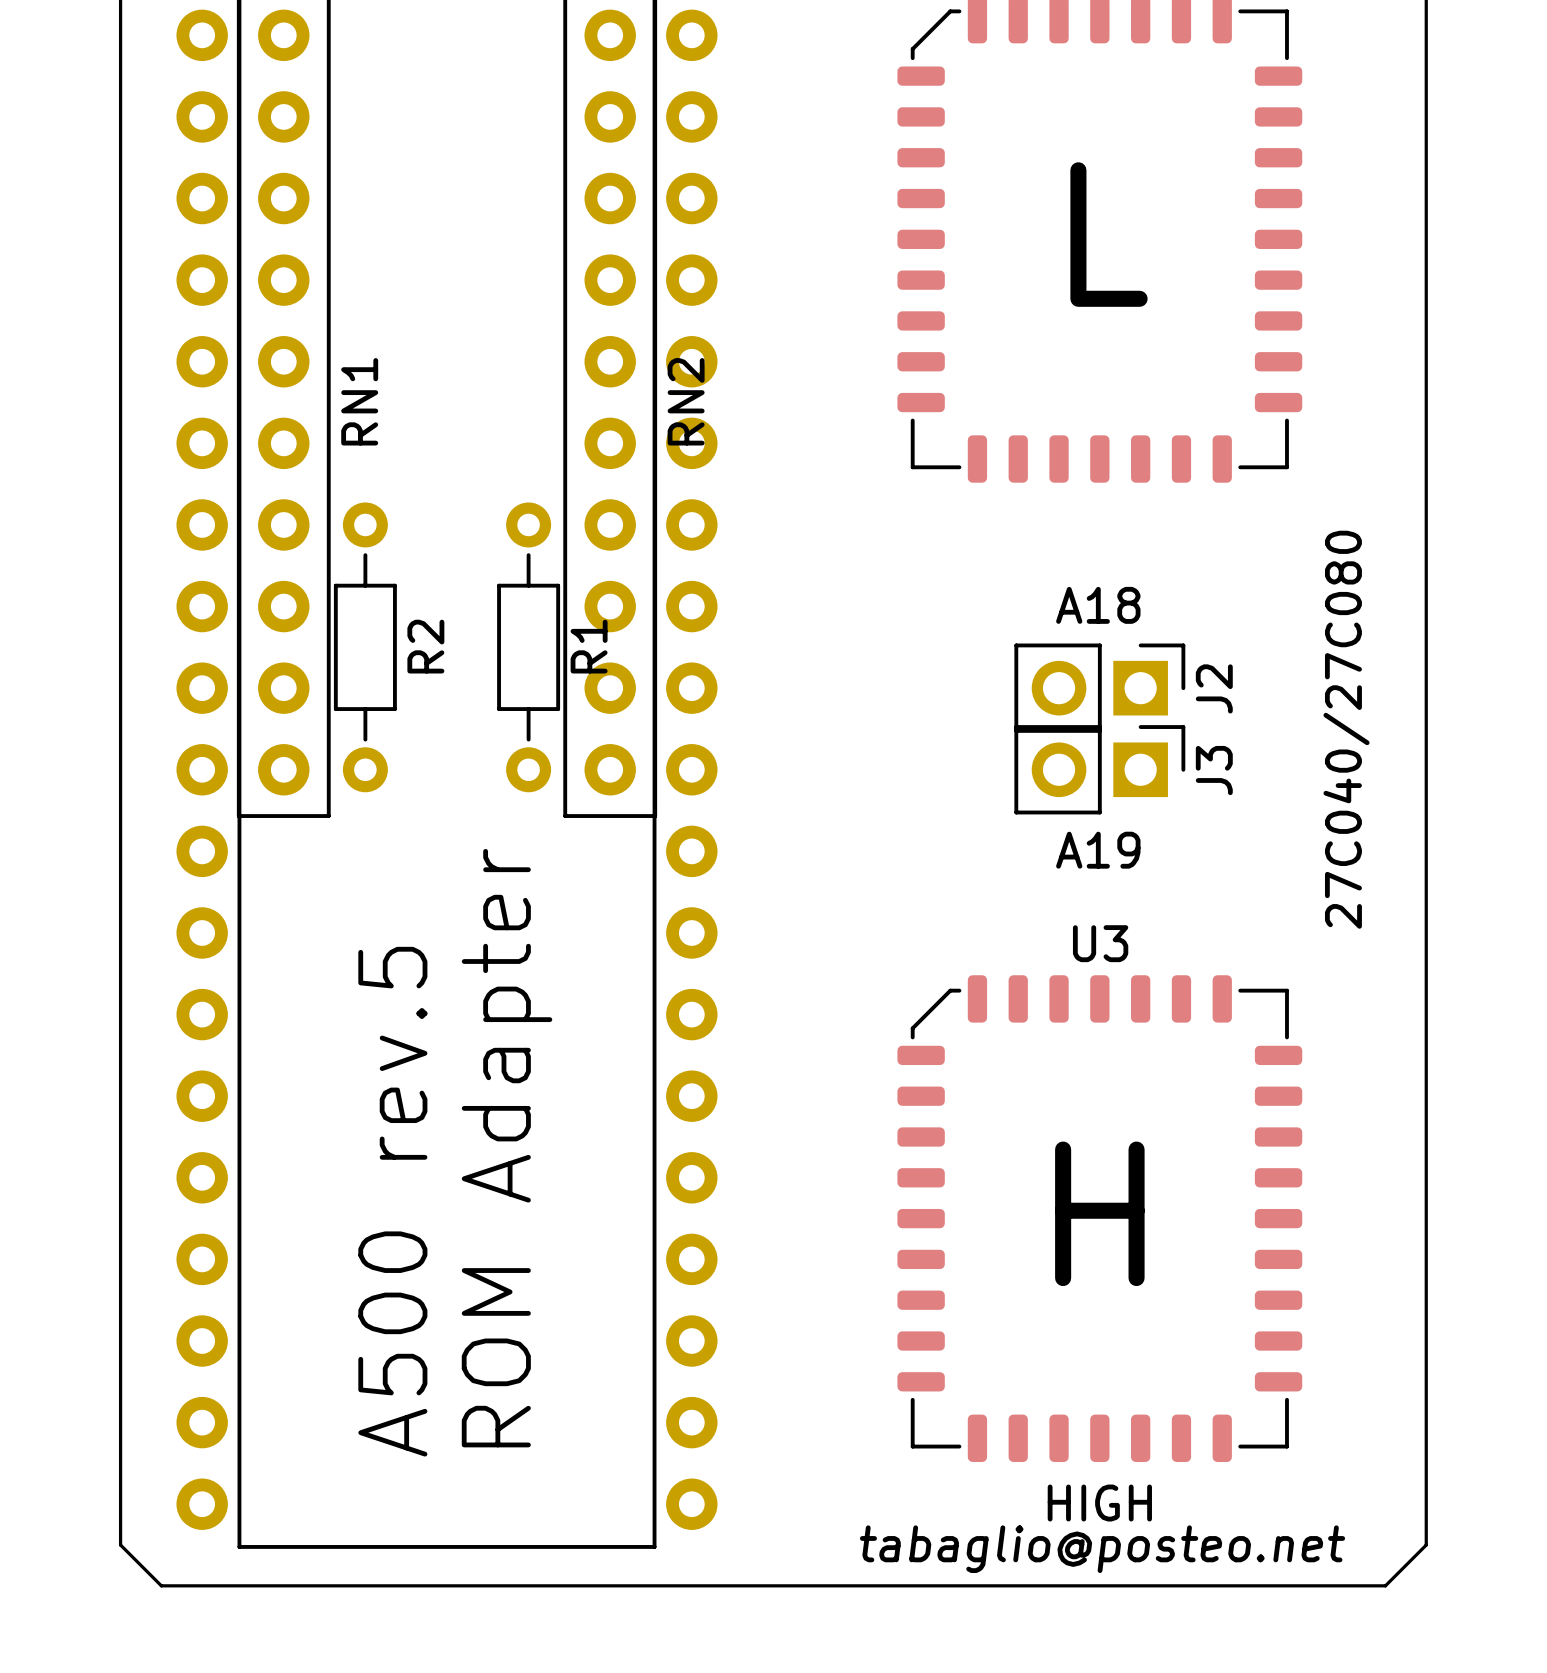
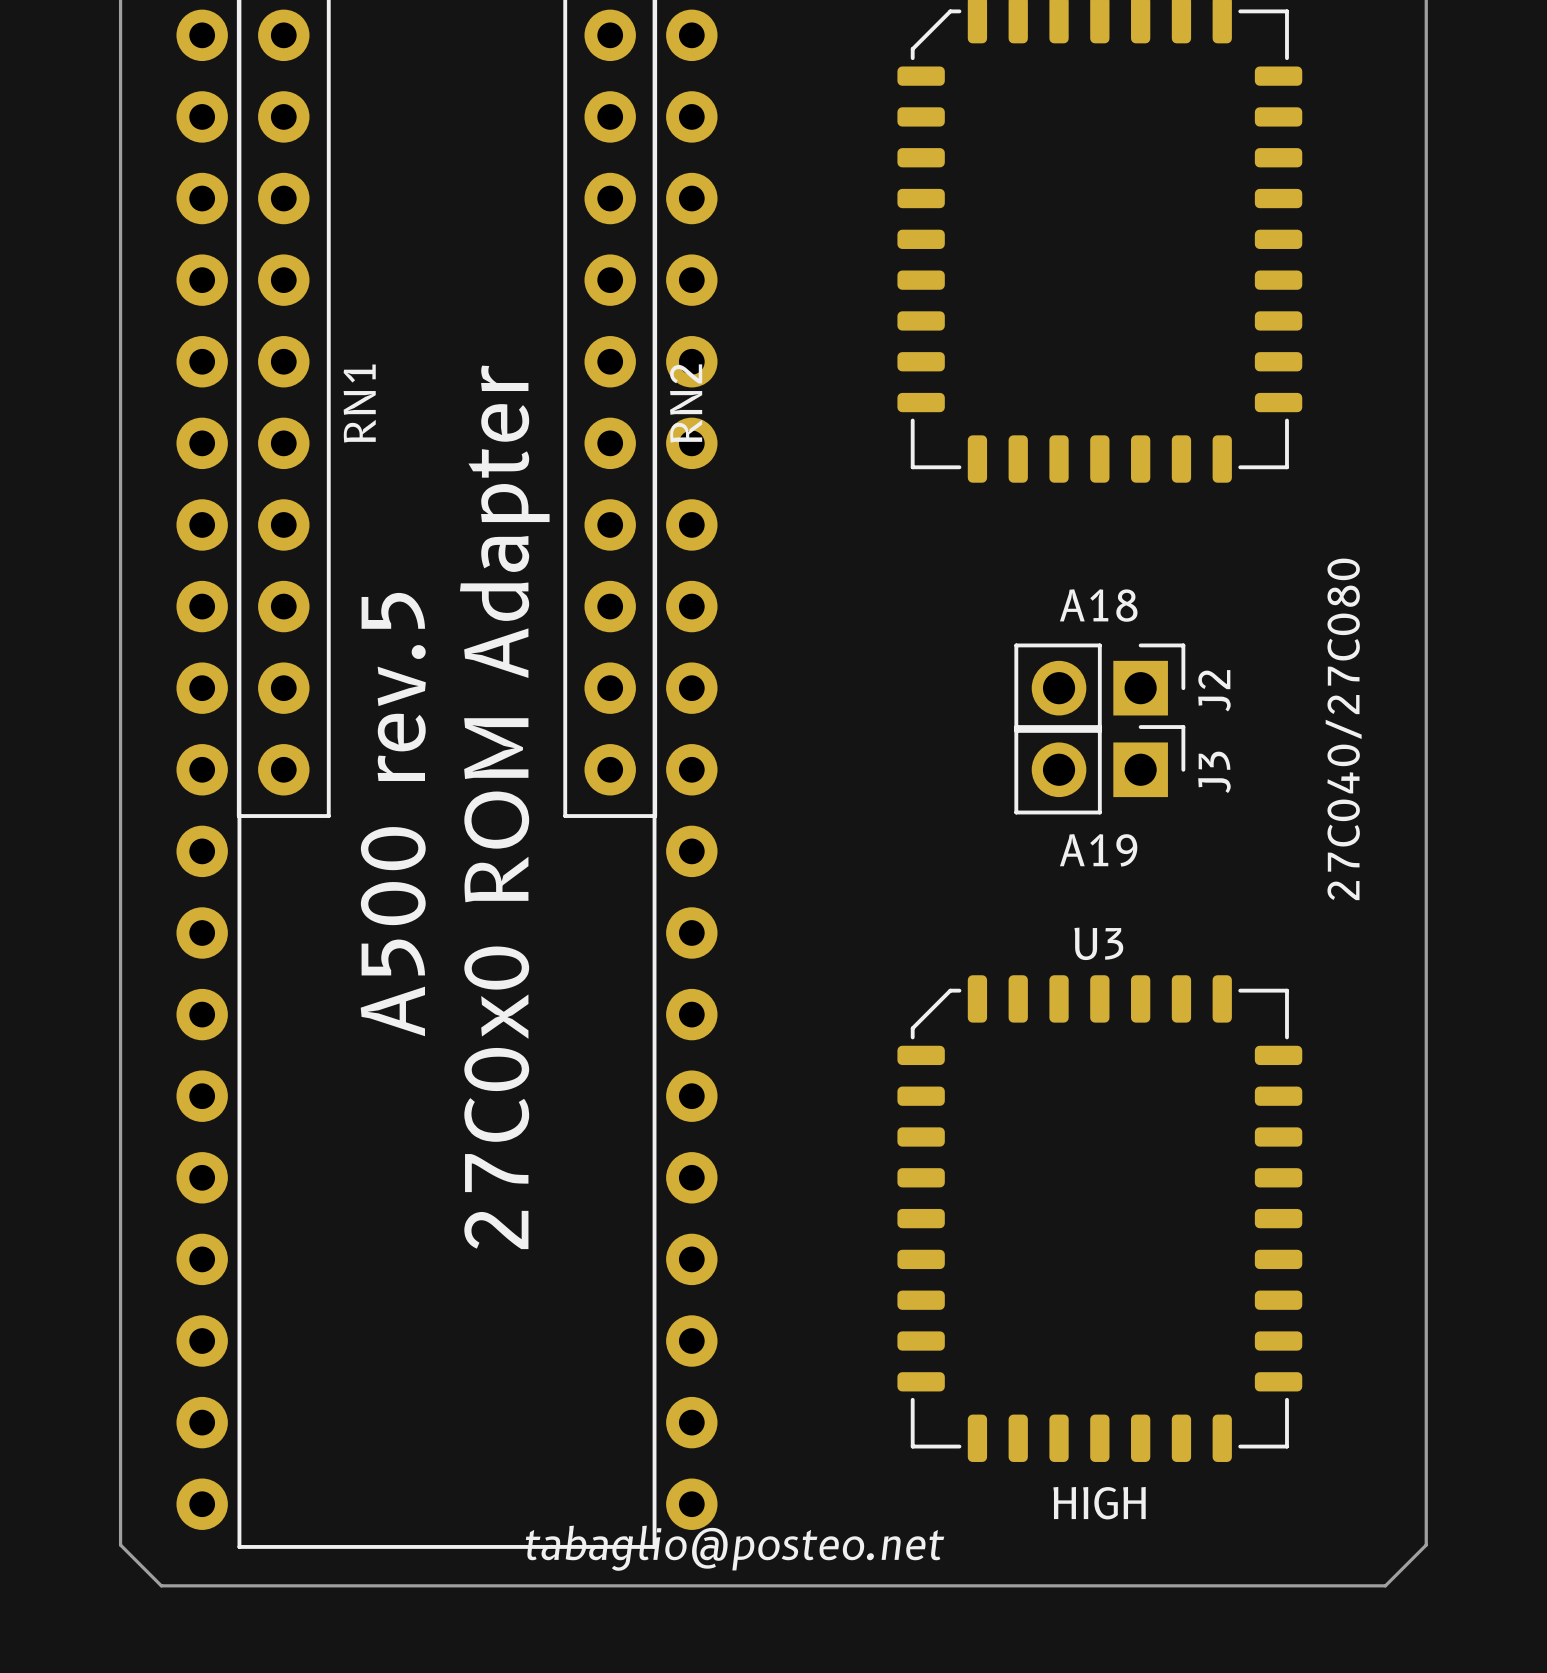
text: L (1109, 234) -> none
R2: (365, 647) -> none
R1: (528, 647) -> none
text: ROM Adapter (507, 1148) -> 27C0x0 ROM Adapter (504, 807)
text position: A500 rev.5 (392, 1201) -> A500 rev.5 (393, 814)
text: H (1099, 1213) -> none
text position: tabaglio@posteo.net (1102, 1549) -> tabaglio@posteo.net (735, 1548)

